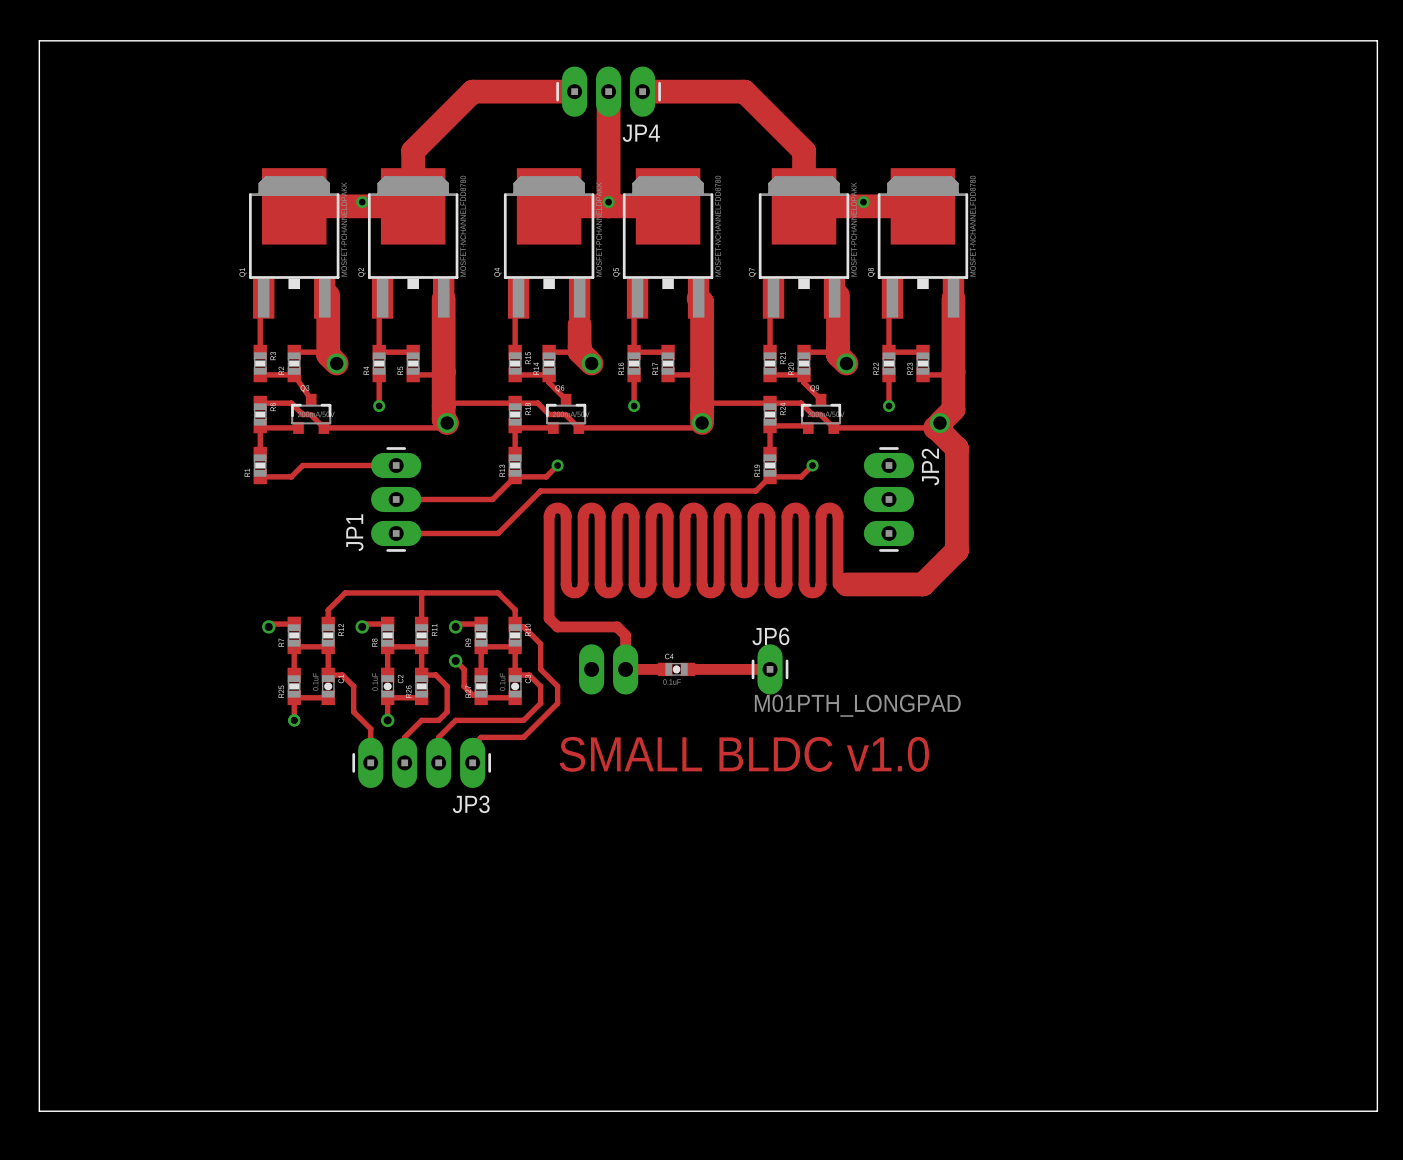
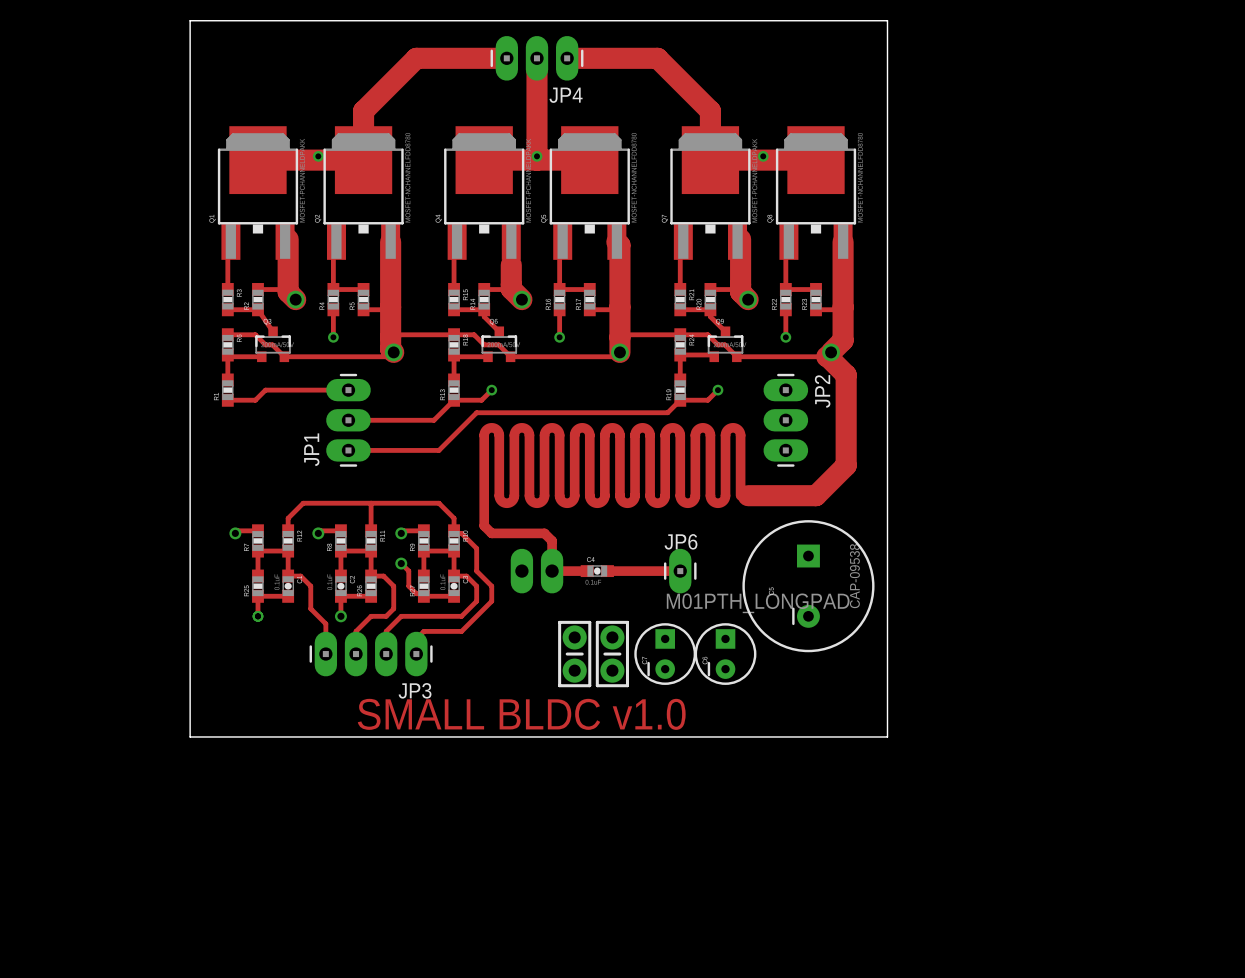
board edge: (39, 40) (1377, 40) (1377, 1111) (39, 1111) (39, 40) -> none
board edge: none -> (190, 20) (887, 20) (887, 736) (190, 736) (190, 20)
part: none -> CAP-09538 (808, 586)
text position: SMALL BLDC v1.0 (744, 754) -> SMALL BLDC v1.0 (521, 714)
part: none -> (574, 654)
part: none -> (612, 654)
part: none -> (665, 654)
part: none -> (725, 654)

